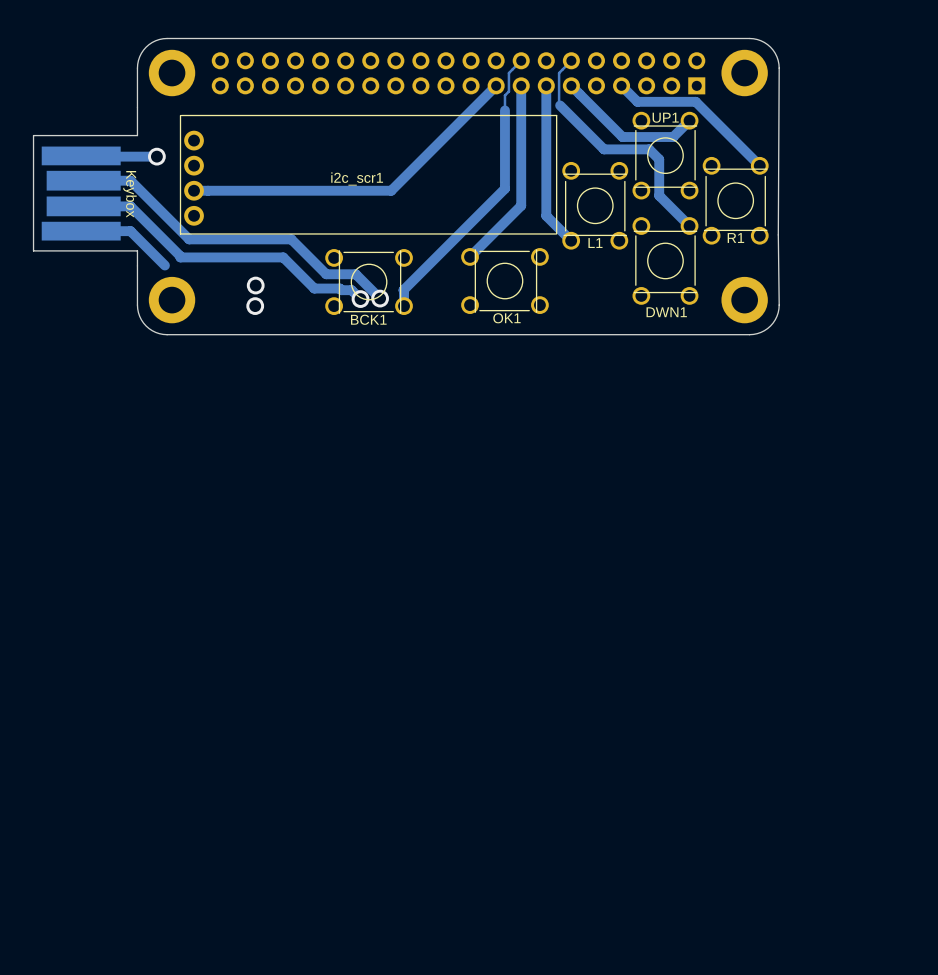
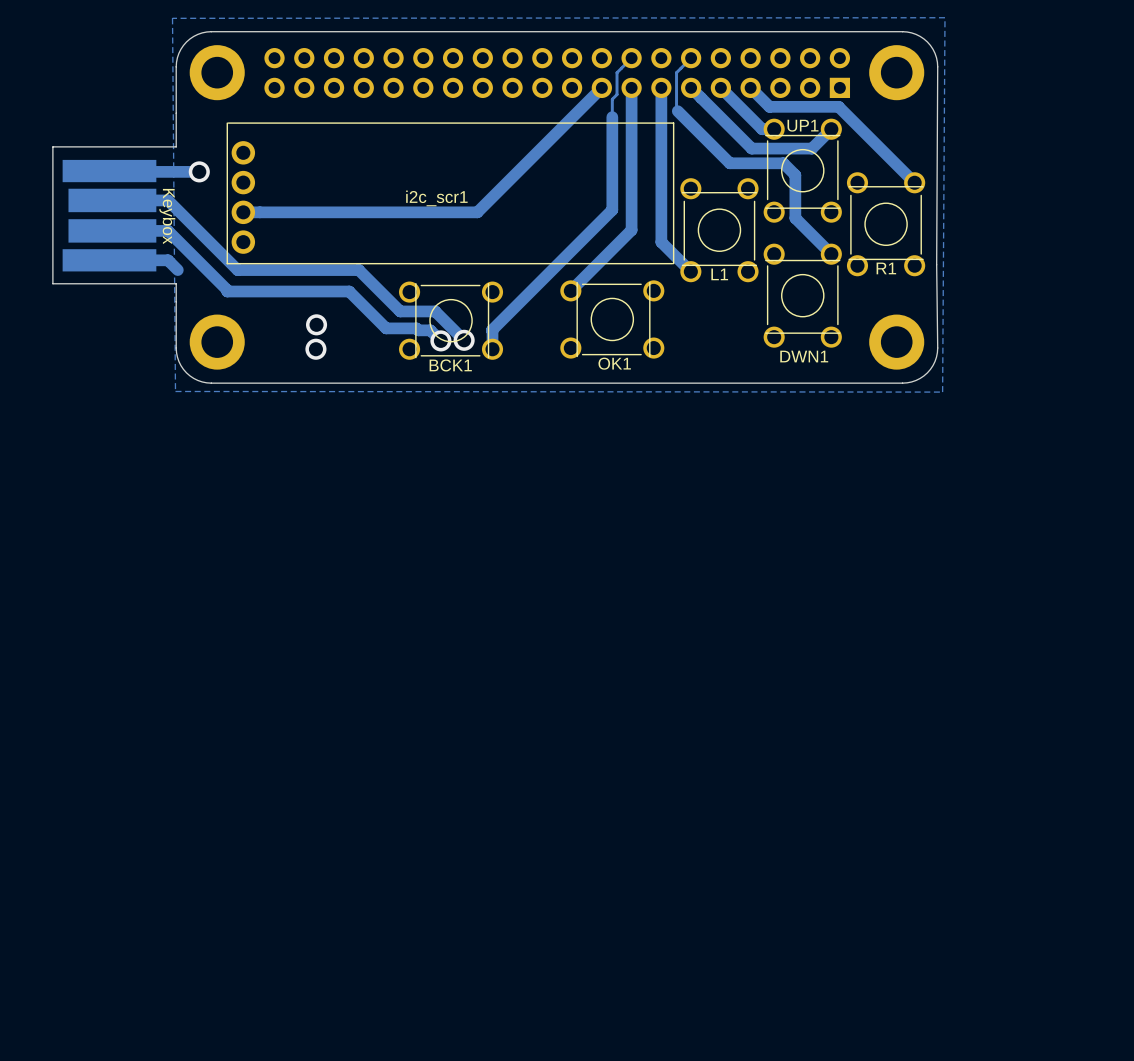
zone outline: none -> (944, 17) (942, 392) (175, 391) (172, 18) (944, 17)
track: none -> (720, 87) (762, 129) (774, 129)
track: (138, 239) (164, 265) -> none

